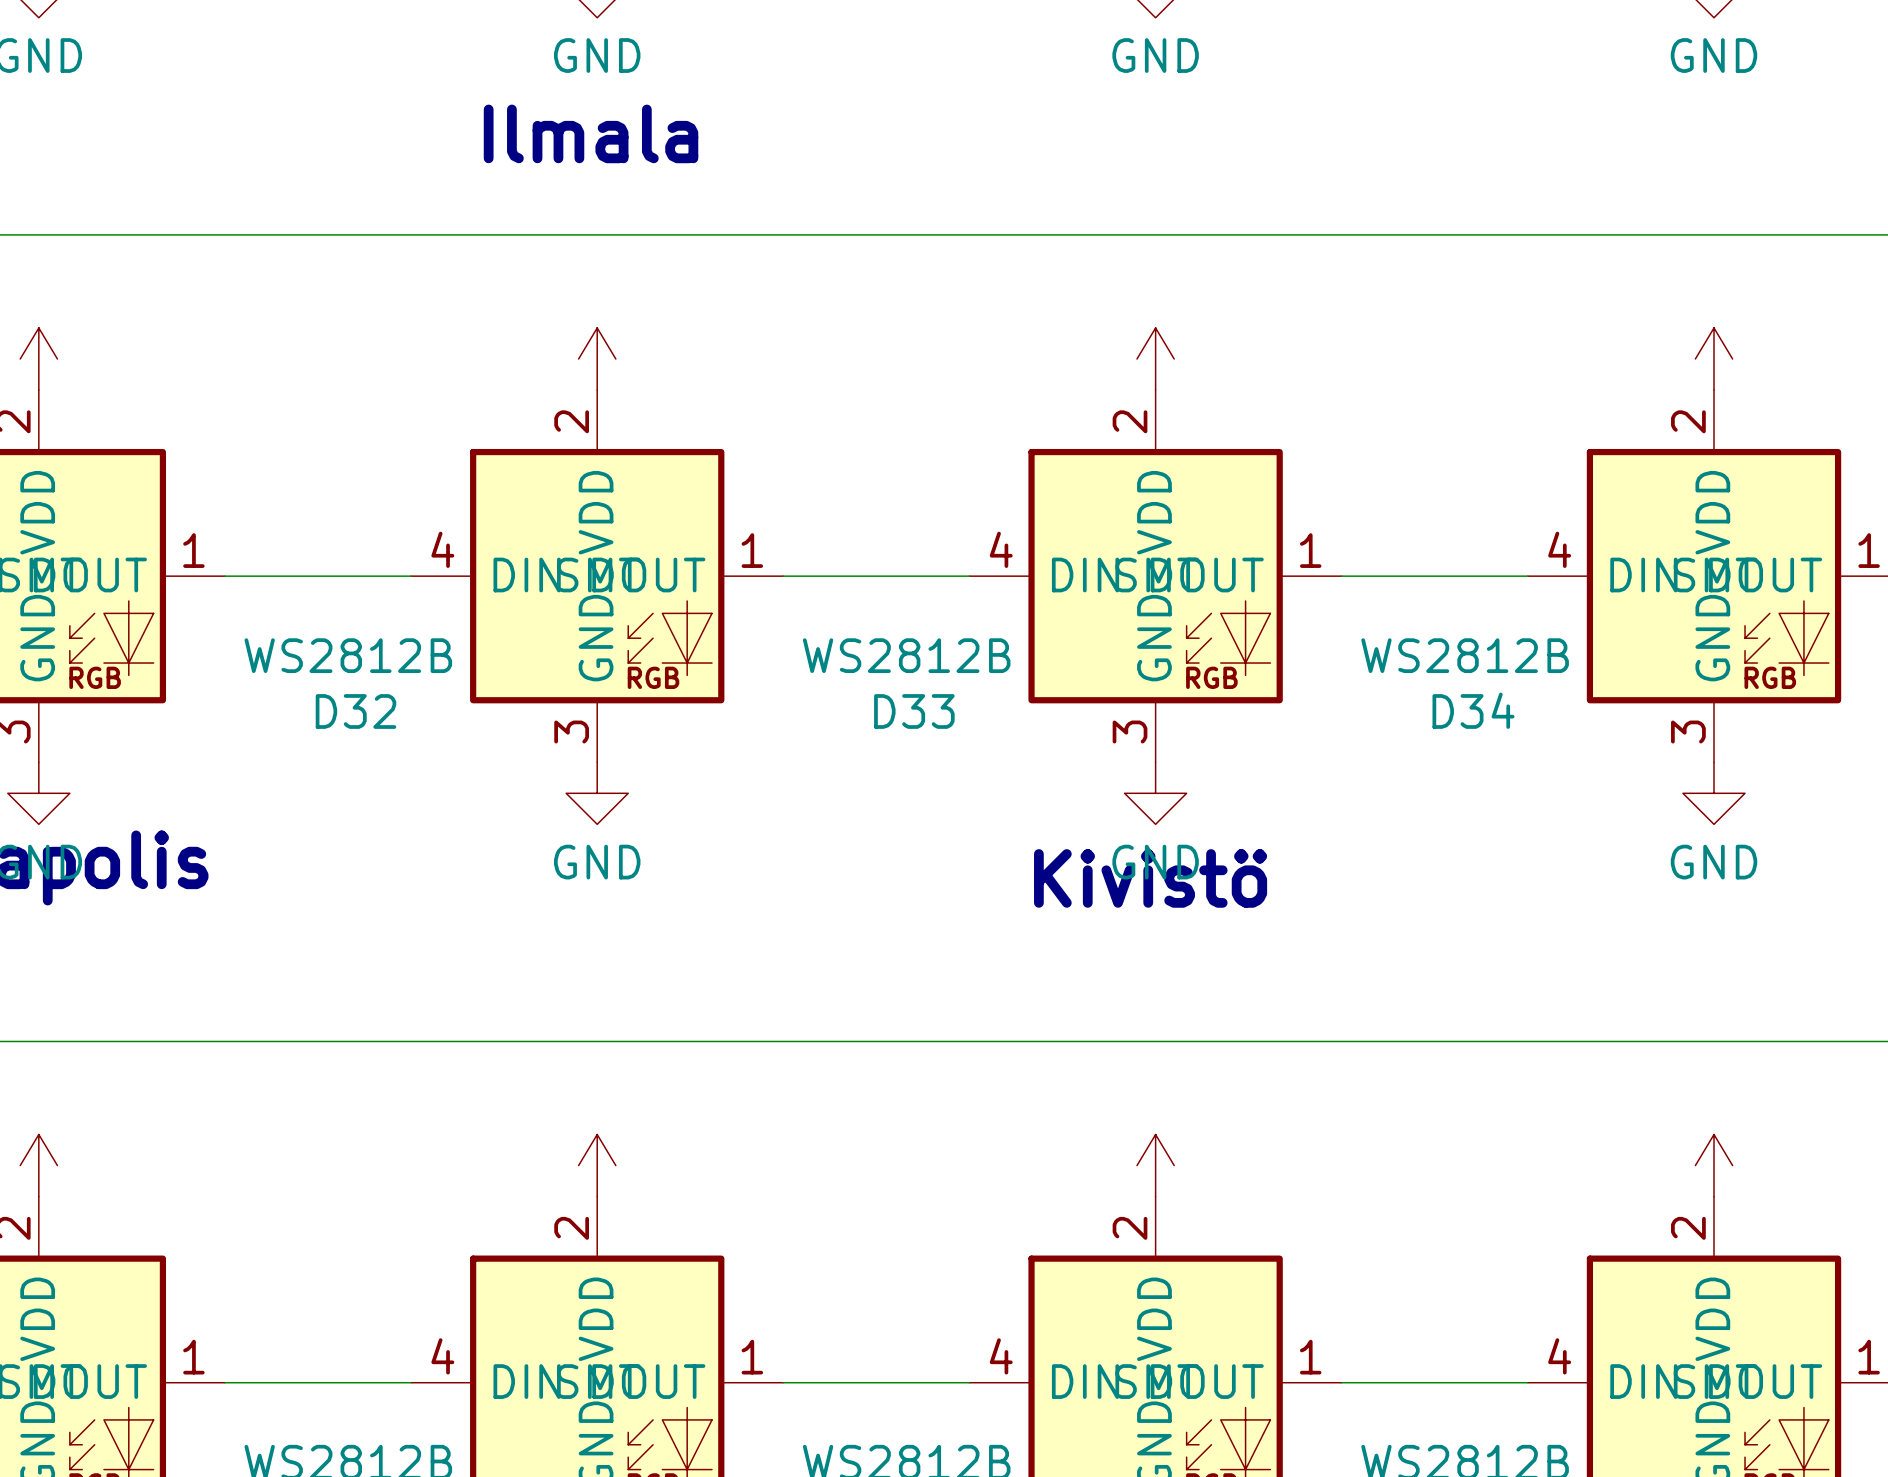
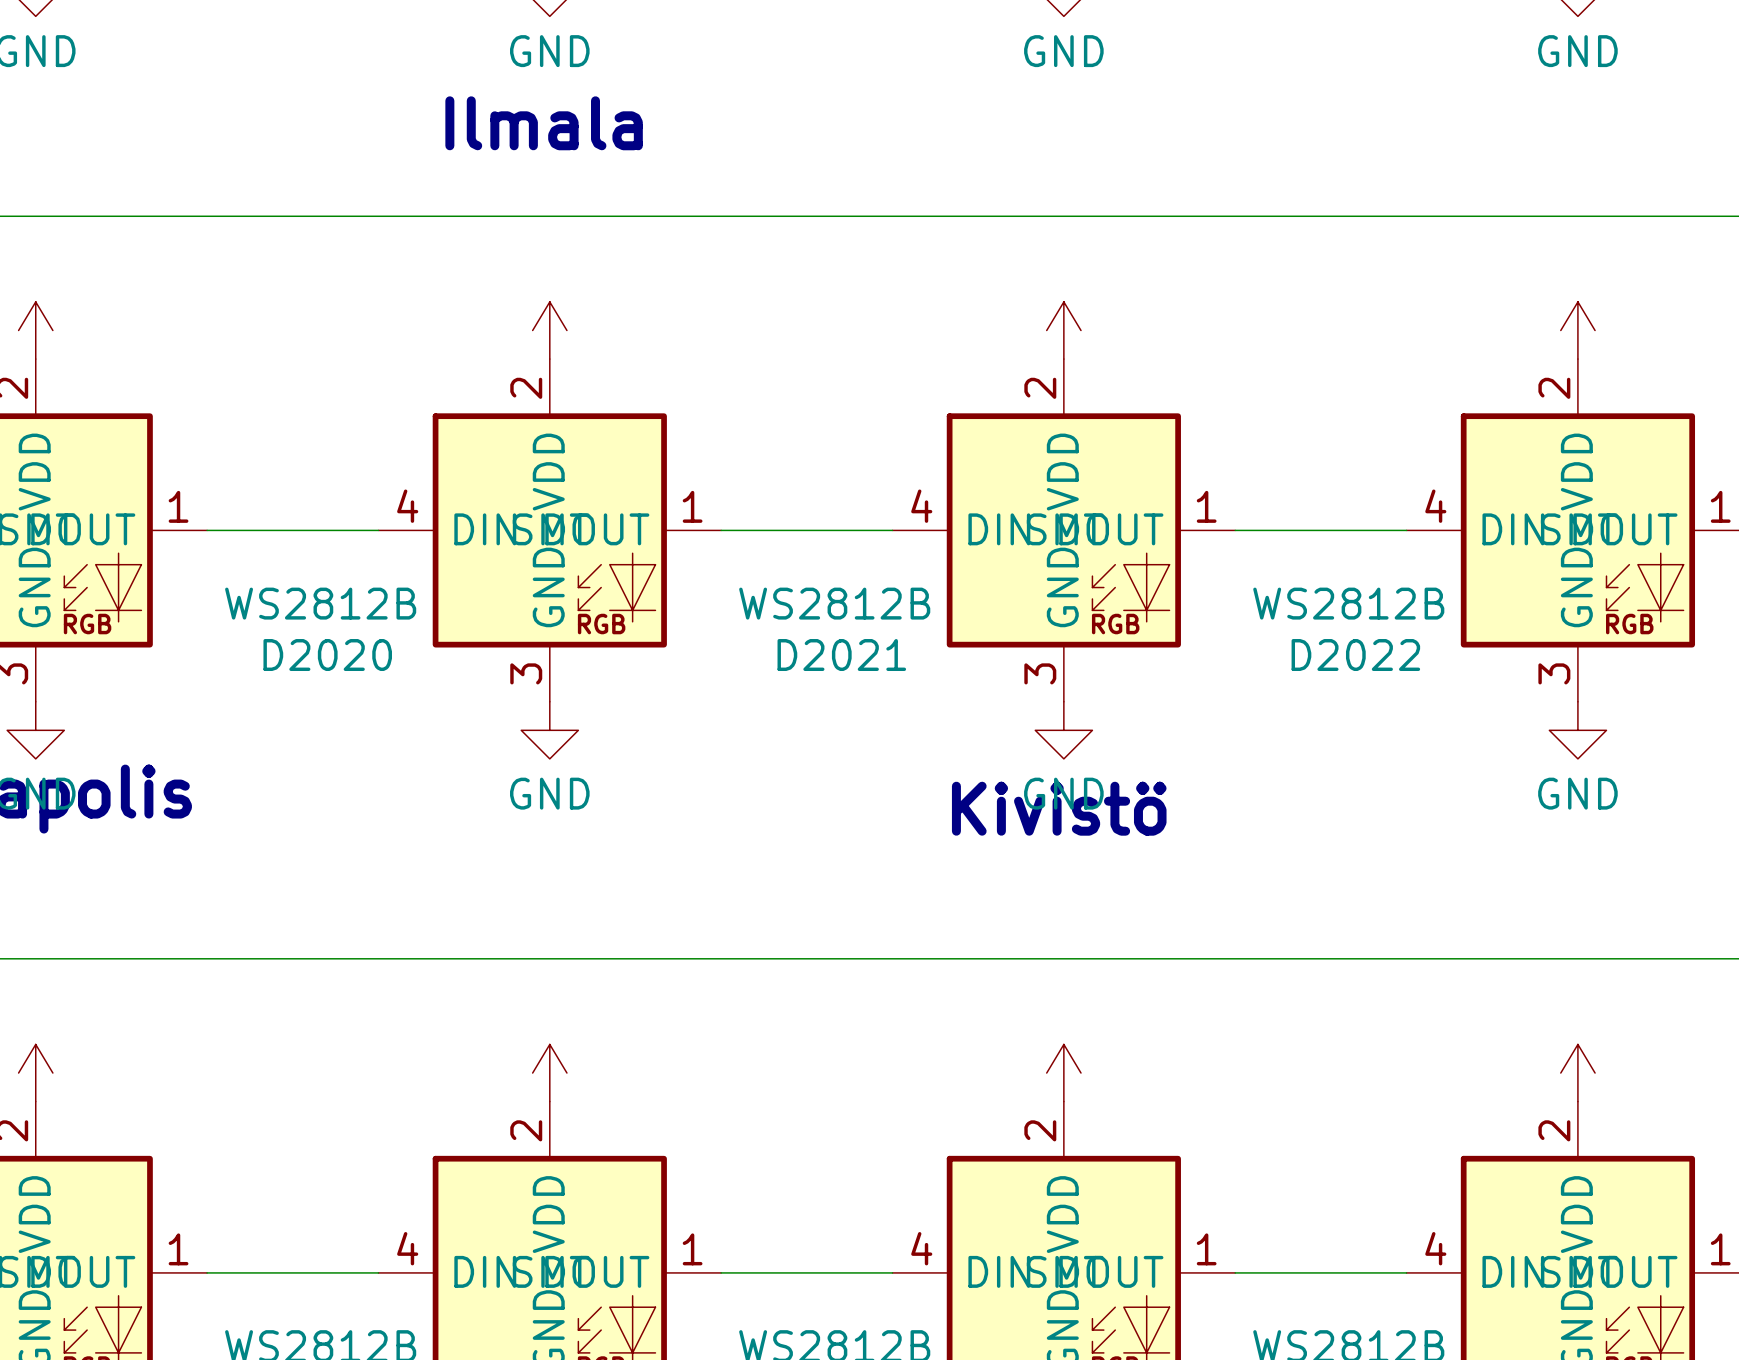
D34 name: D34 (1473, 710) -> D2022 (1355, 655)
D32 name: D32 (355, 711) -> D2020 (327, 655)
D33 name: D33 (914, 711) -> D2021 (841, 655)

